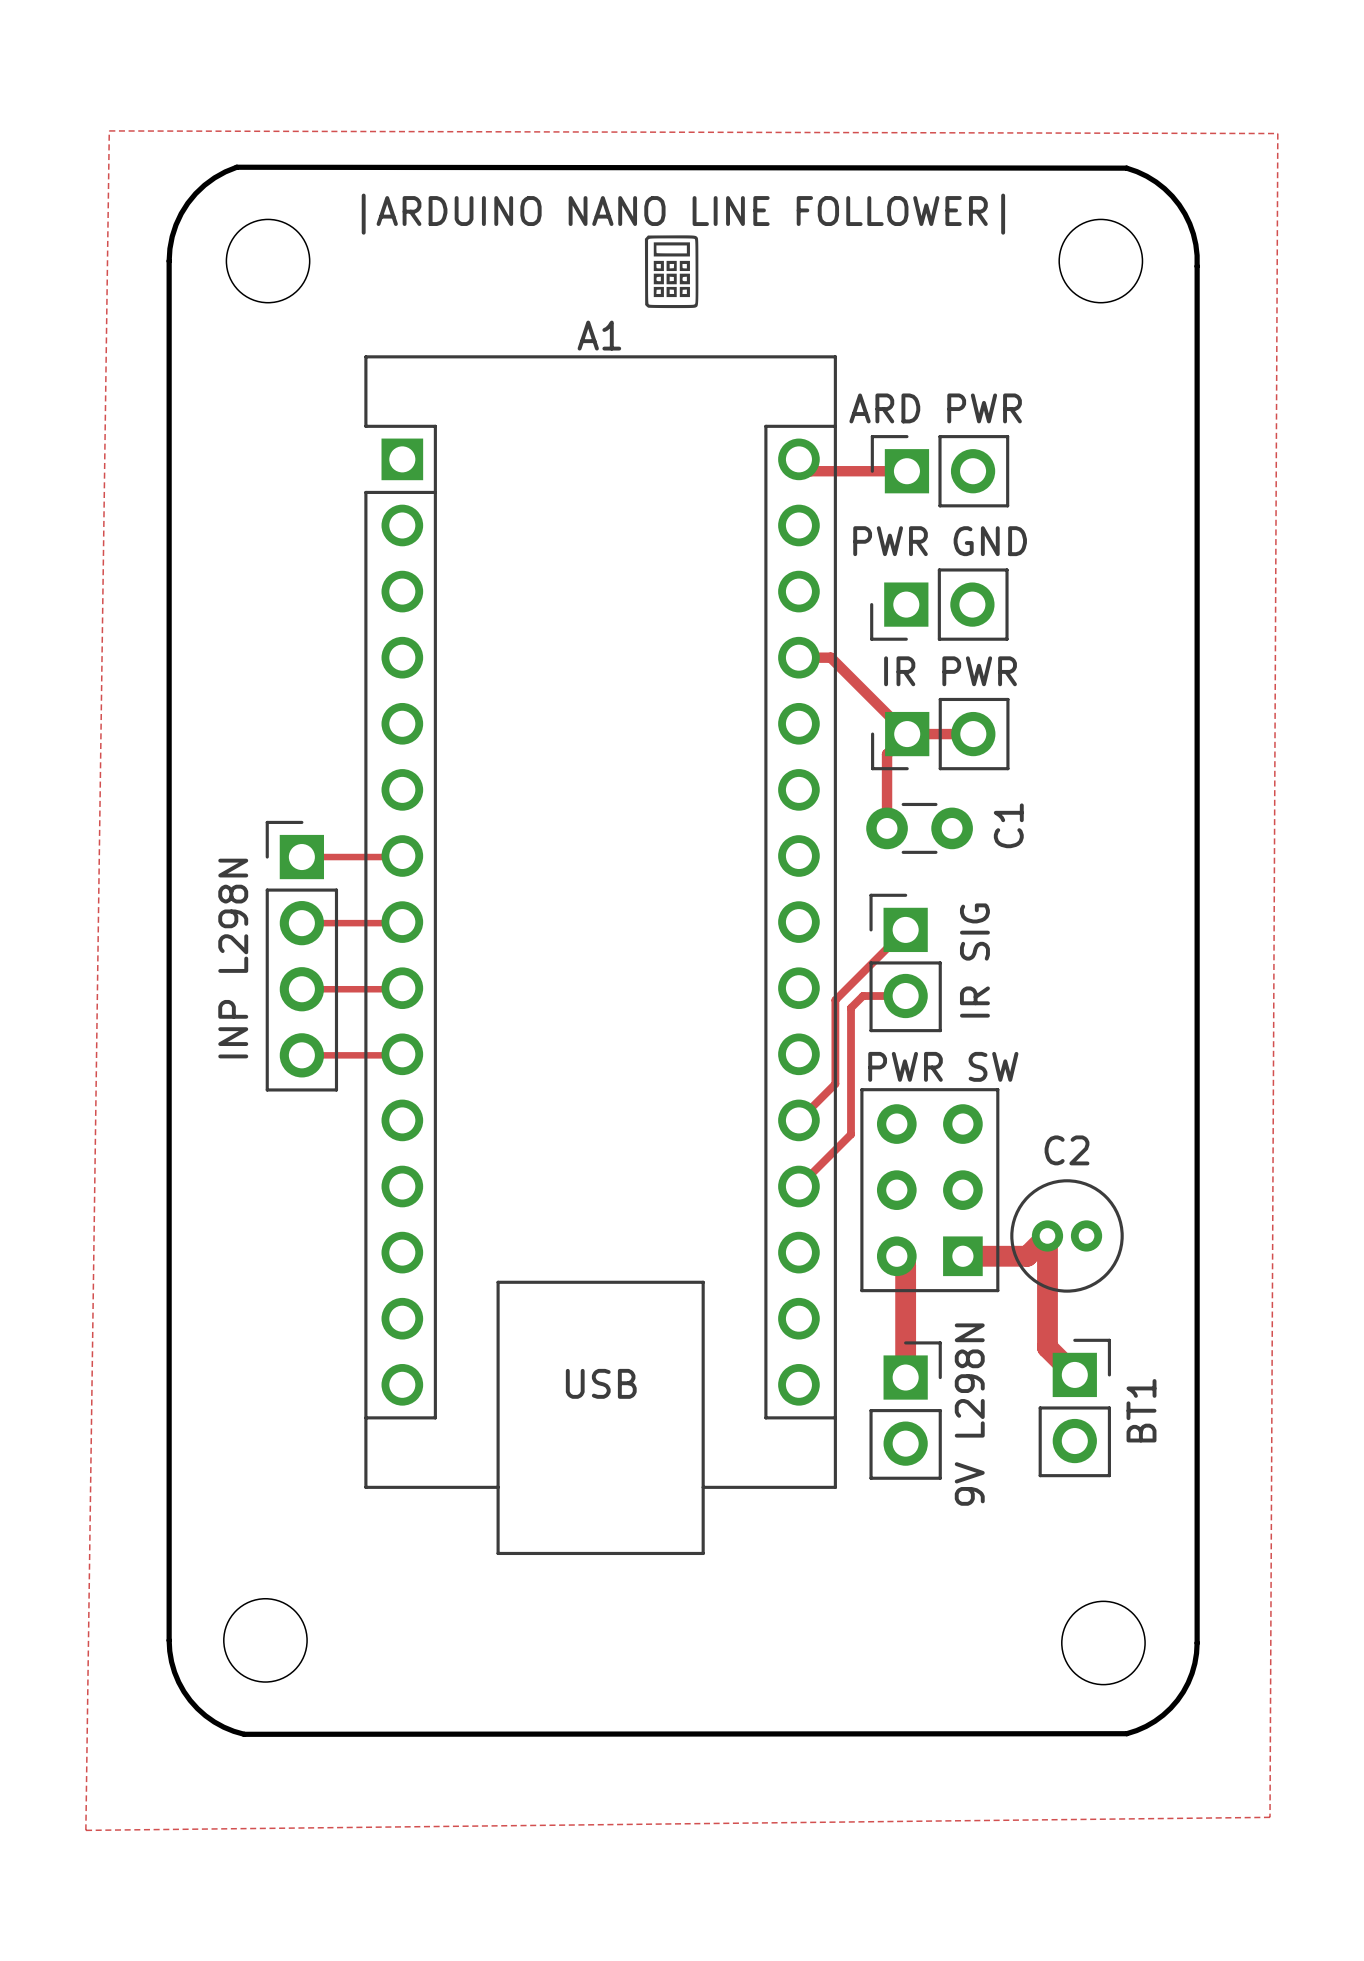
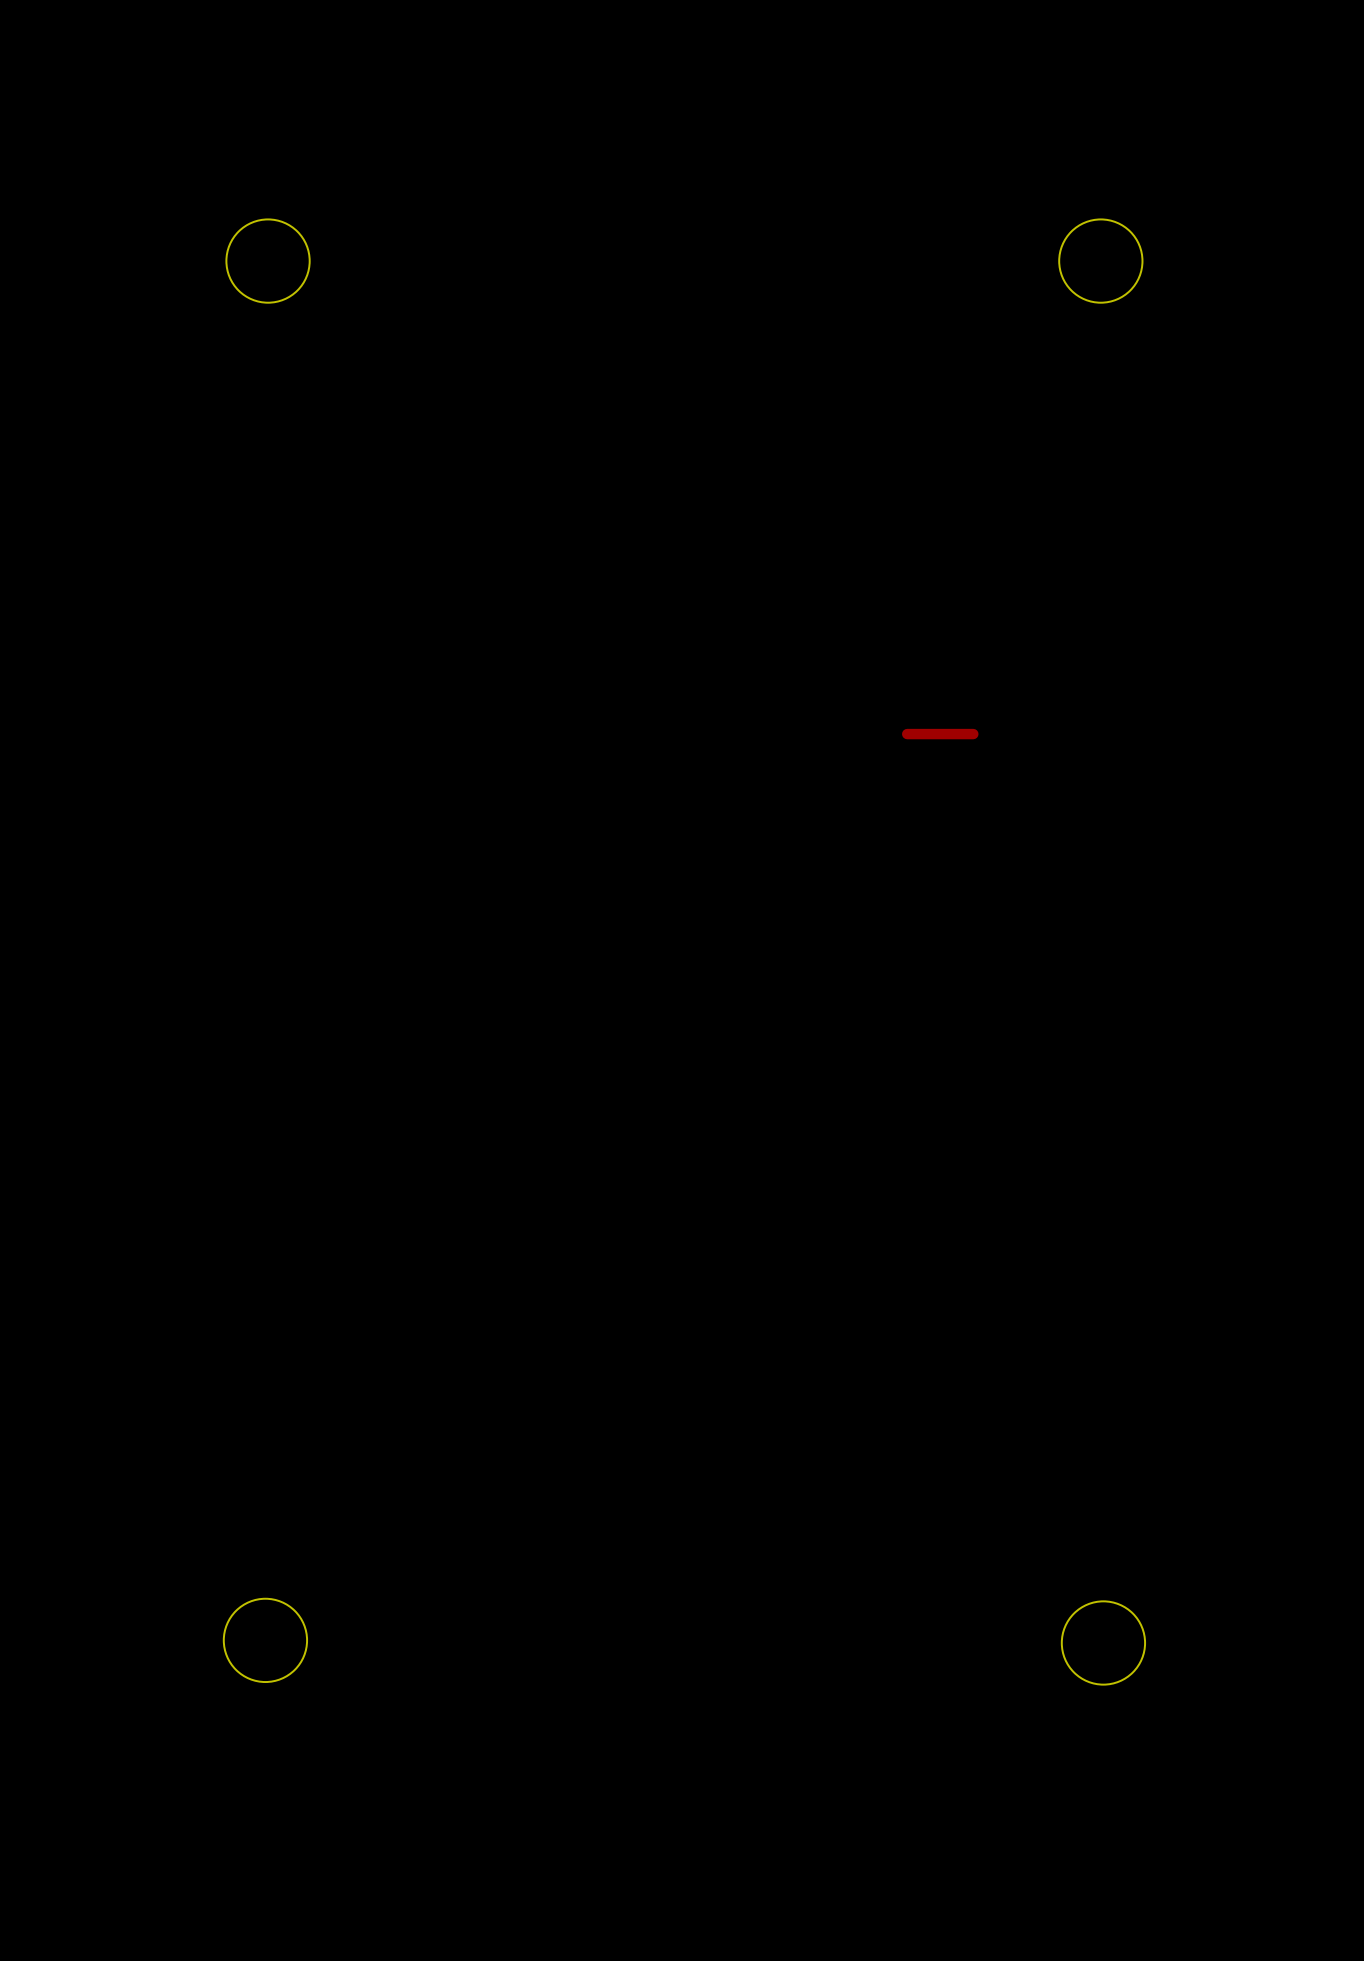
zone outline: (109, 130) (1277, 133) (1270, 1817) (85, 1830) (109, 130) -> none
board edge: (236, 167) (1126, 168) (1156, 181) (1172, 196) (1184, 213) (1193, 234) (1197, 255) (1197, 1642) (1192, 1673) (1183, 1691) (1170, 1708) (1154, 1721) (1126, 1733) (244, 1734) (214, 1722) (197, 1708) (183, 1691) (174, 1672) (169, 1640) (169, 261) (169, 248) (176, 224) (187, 203) (195, 193) (214, 177) (236, 167) -> none
text: |ARDUINO NANO LINE FOLLOWER| (683, 214) -> none
drawing: [644, 235, 699, 309] -> none
track: (798, 459) (810, 471) (906, 471) -> none
ARD PWR: (940, 471) -> none
PWR GND: (939, 604) -> none
track: (798, 657) (830, 657) (907, 734) (887, 754) (887, 828) -> none
IR PWR: (940, 734) -> none
C1: (919, 828) -> none
track: (402, 855) (301, 857) -> none
track: (402, 922) (301, 923) -> none
track: (905, 929) (835, 1000) (835, 1083) (798, 1120) -> none
A1: (600, 955) -> none
INP L298N: (301, 956) -> none
IR SIG: (905, 962) -> none
track: (402, 988) (301, 989) -> none
track: (905, 996) (862, 996) (851, 1007) (851, 1134) (798, 1186) -> none
track: (402, 1054) (301, 1055) -> none
PWR SW: (929, 1190) -> none
C2: (1067, 1235) -> none
track: (896, 1256) (905, 1265) (905, 1377) -> none
track: (962, 1256) (1027, 1256) (1047, 1235) (1047, 1347) (1074, 1374) -> none
BT1: (1074, 1407) -> none
9V L298N: (905, 1410) -> none

